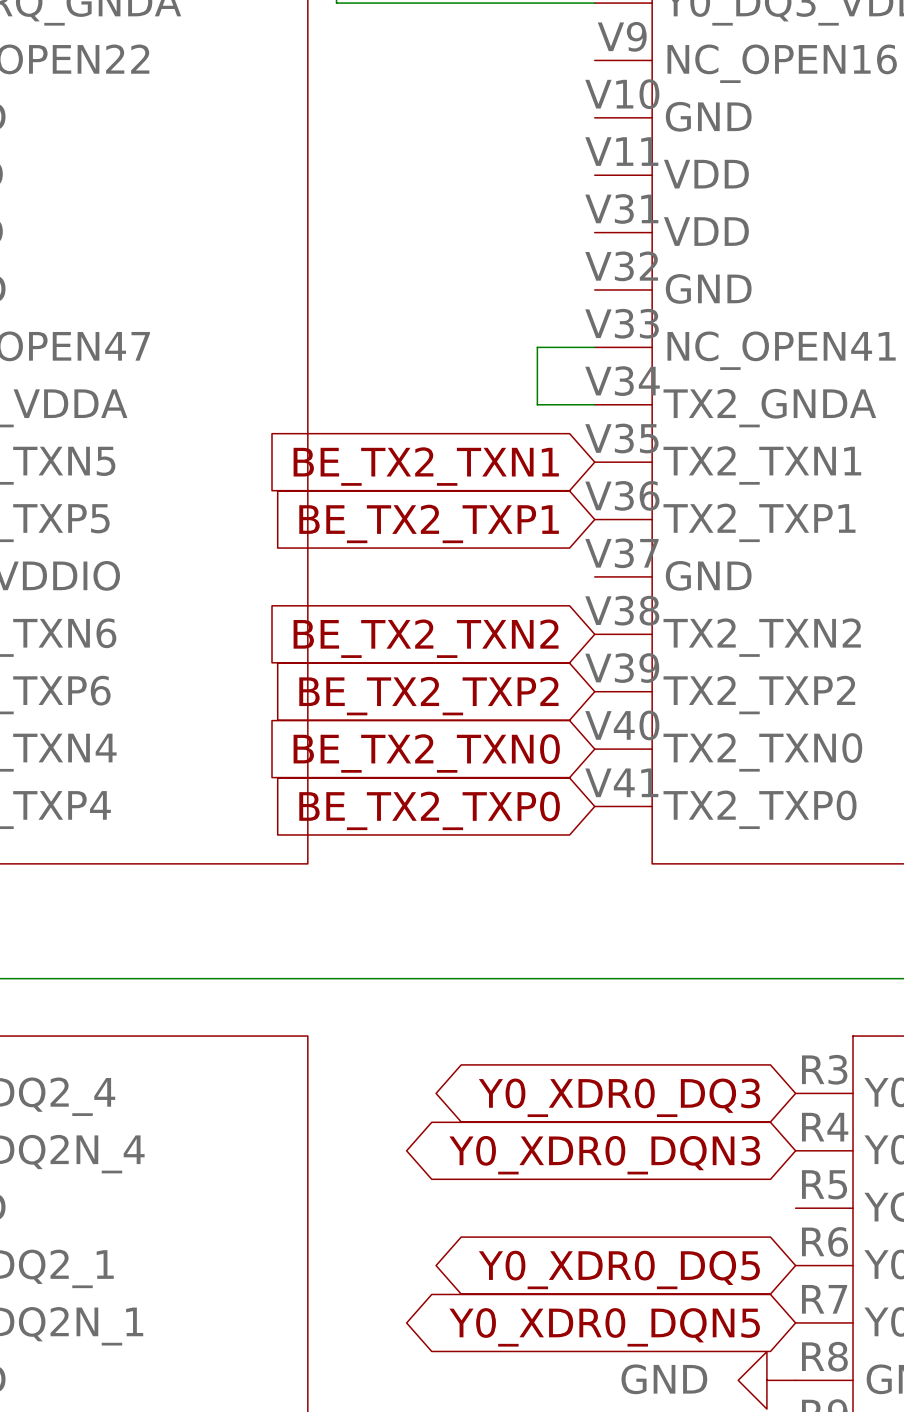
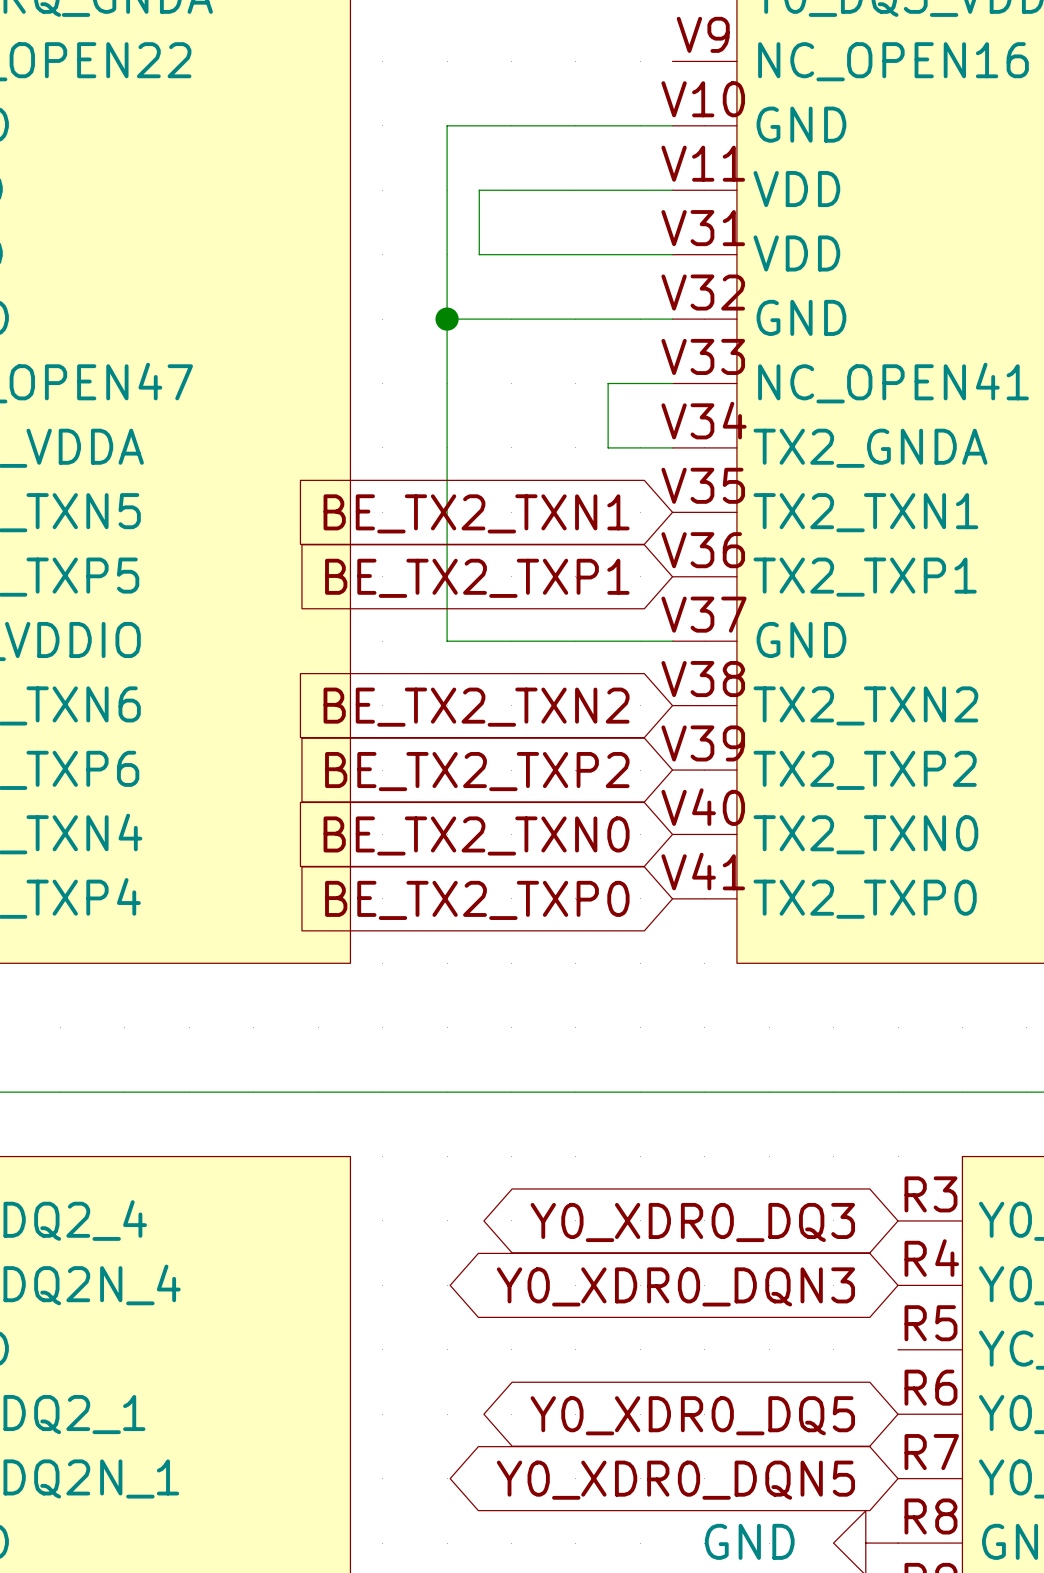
wire: none -> (672, 125) (447, 125) (447, 641) (672, 641)
wire: none -> (672, 190) (479, 190) (479, 254) (672, 254)
wire: none -> (447, 319) (672, 319)
junction: none -> (447, 319)

